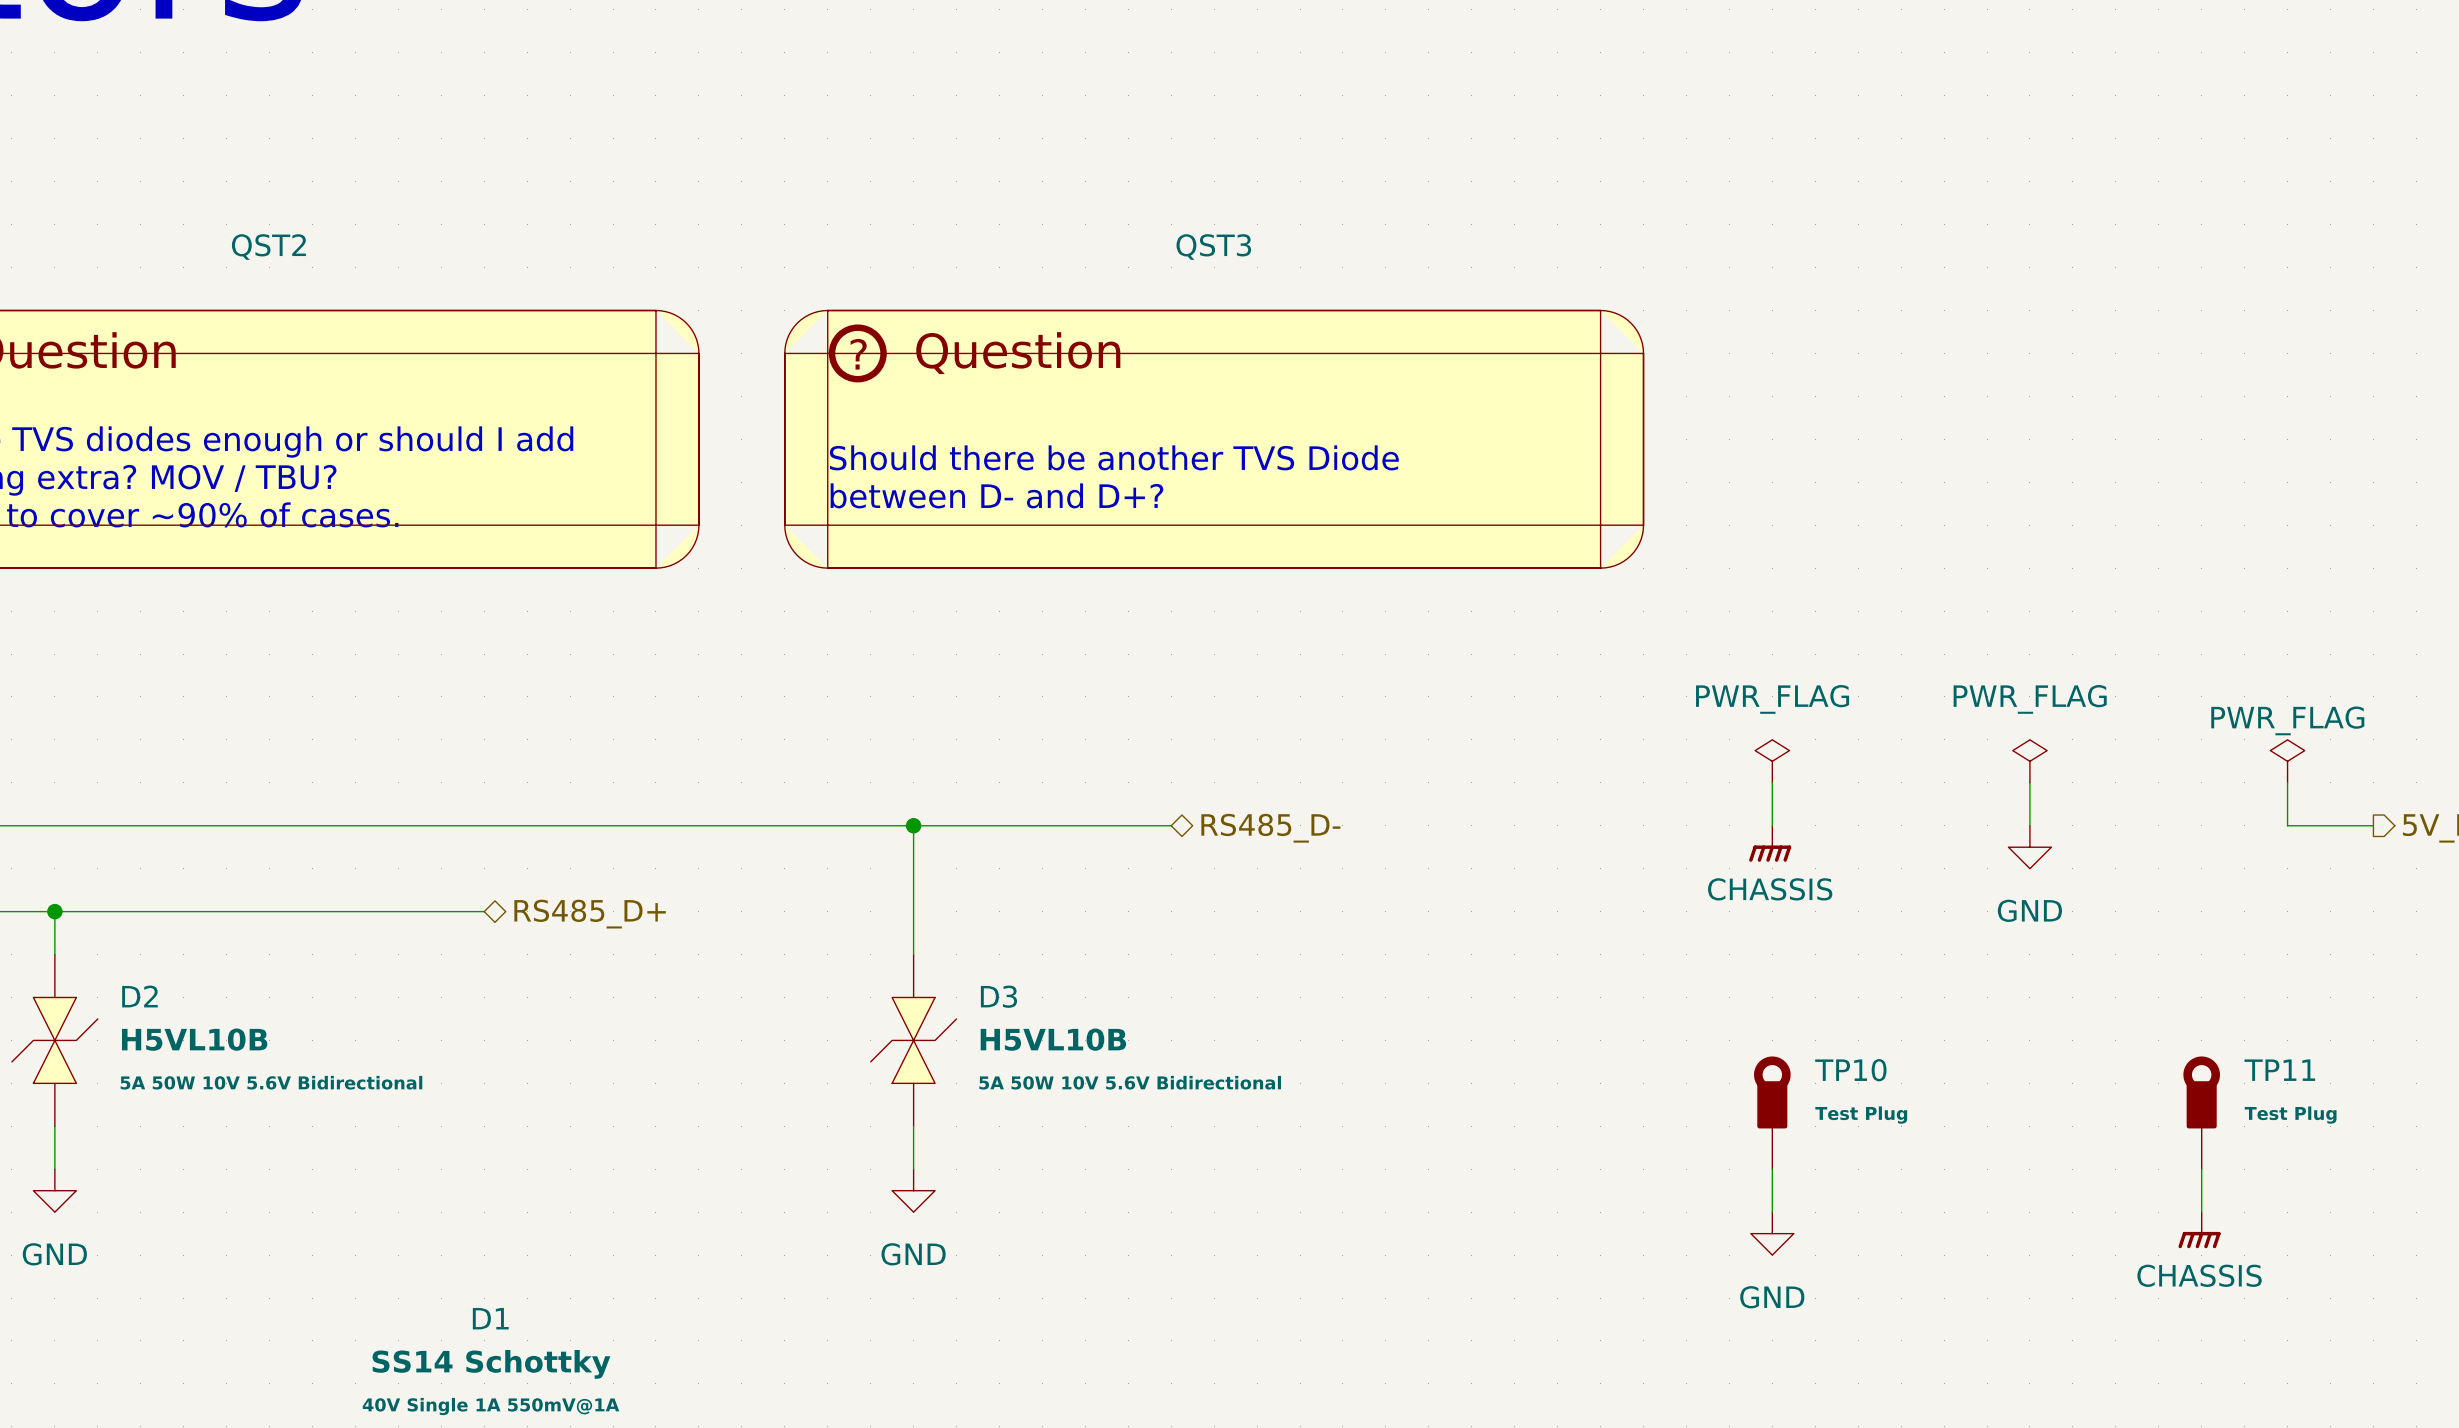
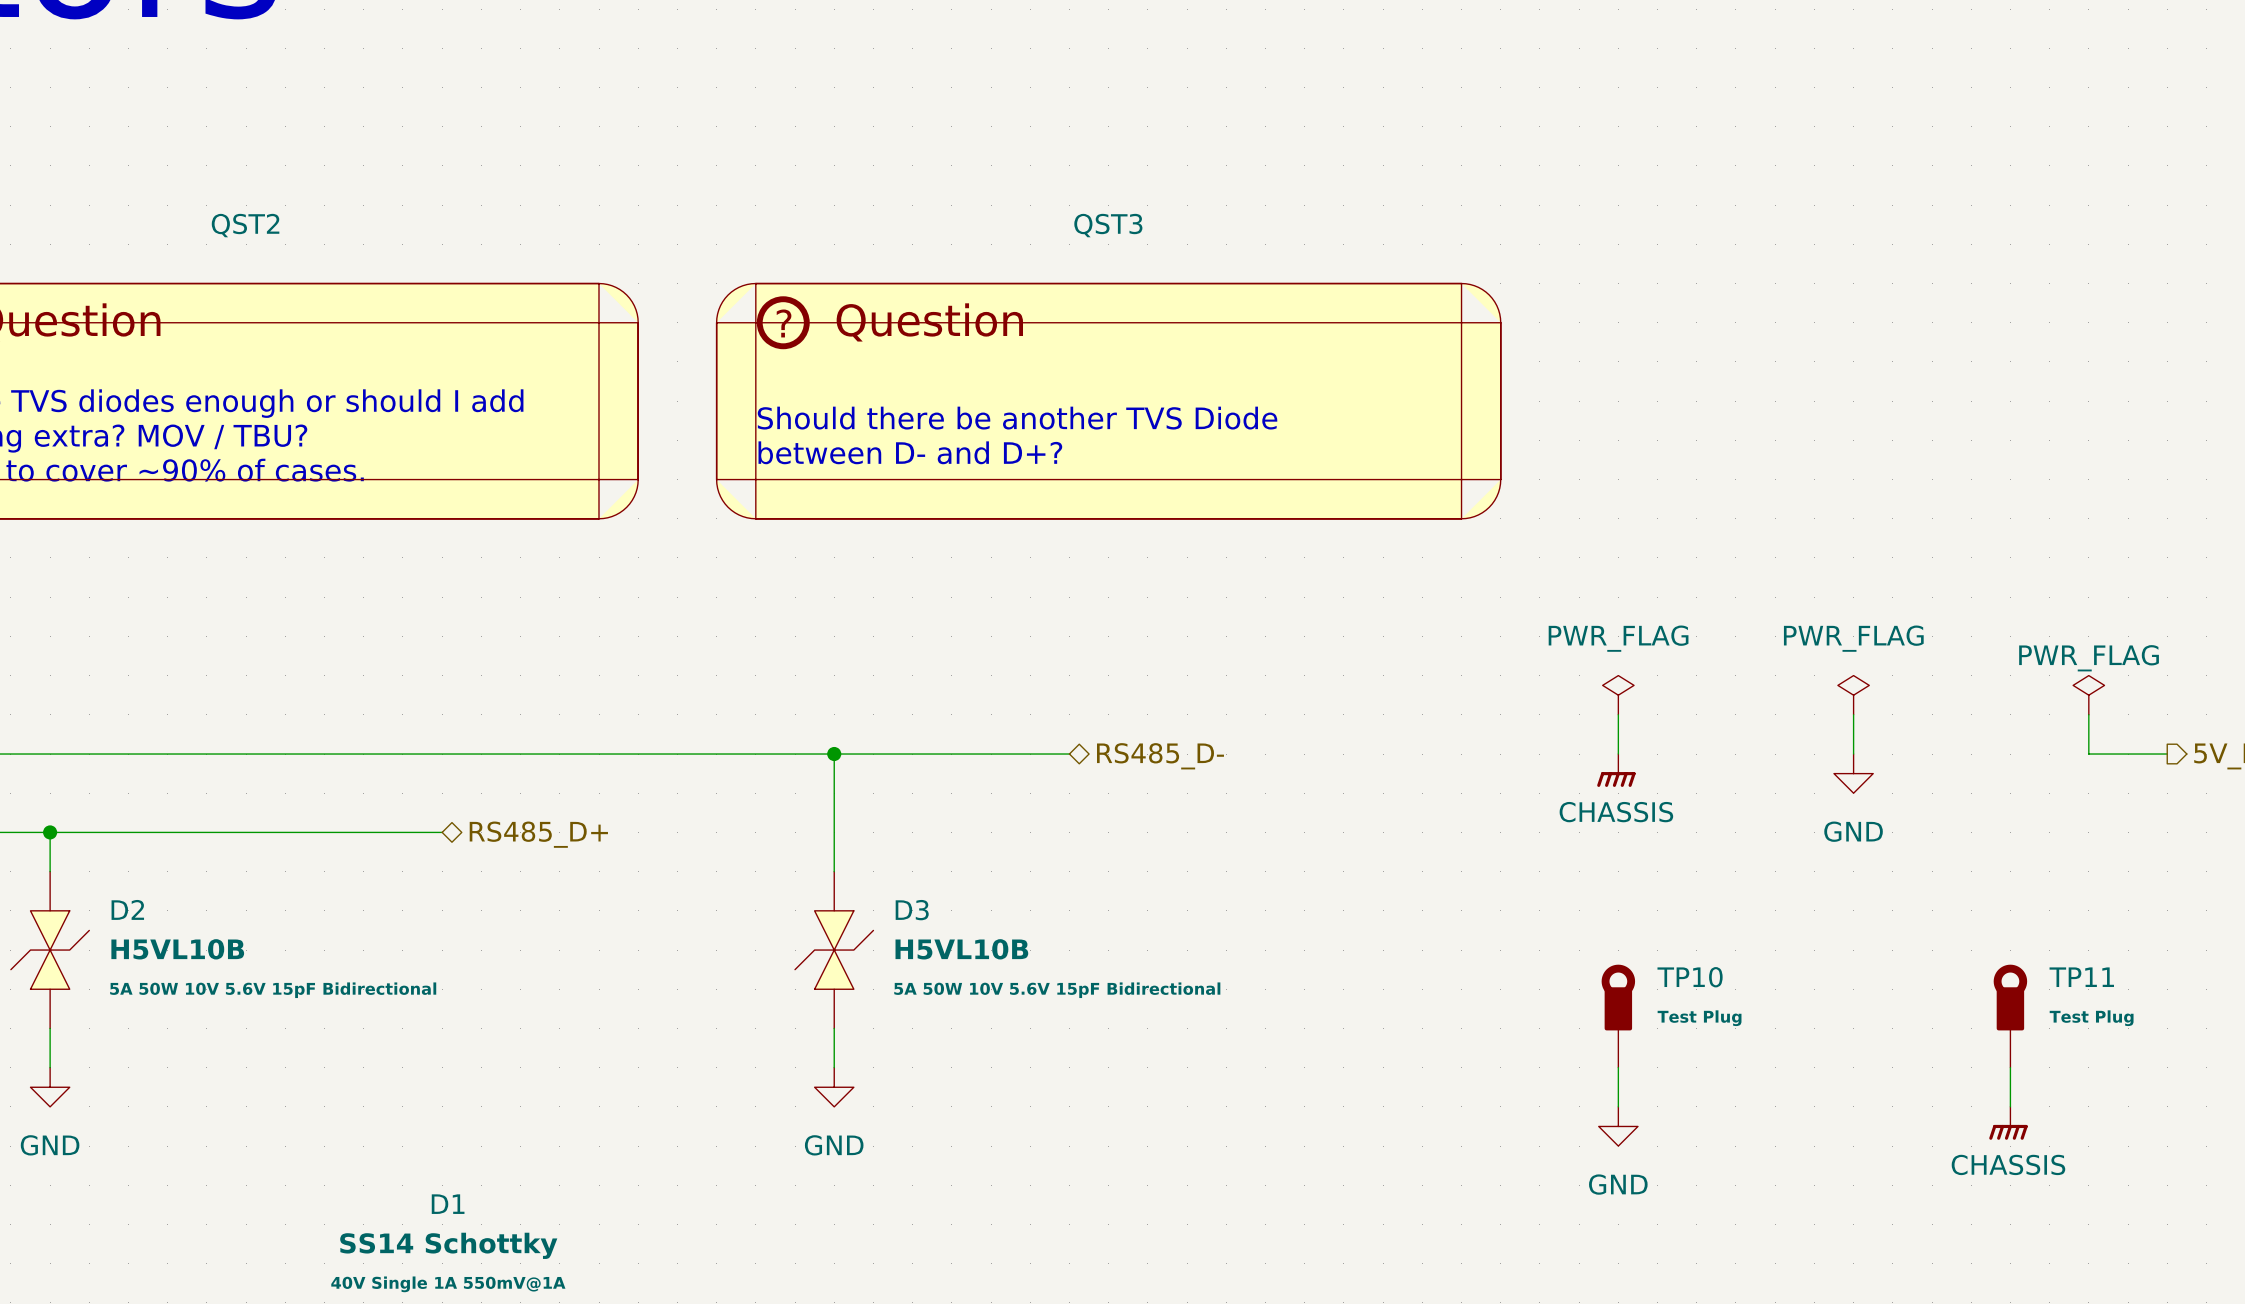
D2 text: 5A 50W 10V 5.6V Bidirectional (271, 1082) -> 5A 50W 10V 5.6V 15pF Bidirectional (273, 990)
D3 text: 5A 50W 10V 5.6V Bidirectional (1130, 1082) -> 5A 50W 10V 5.6V 15pF Bidirectional (1057, 990)

